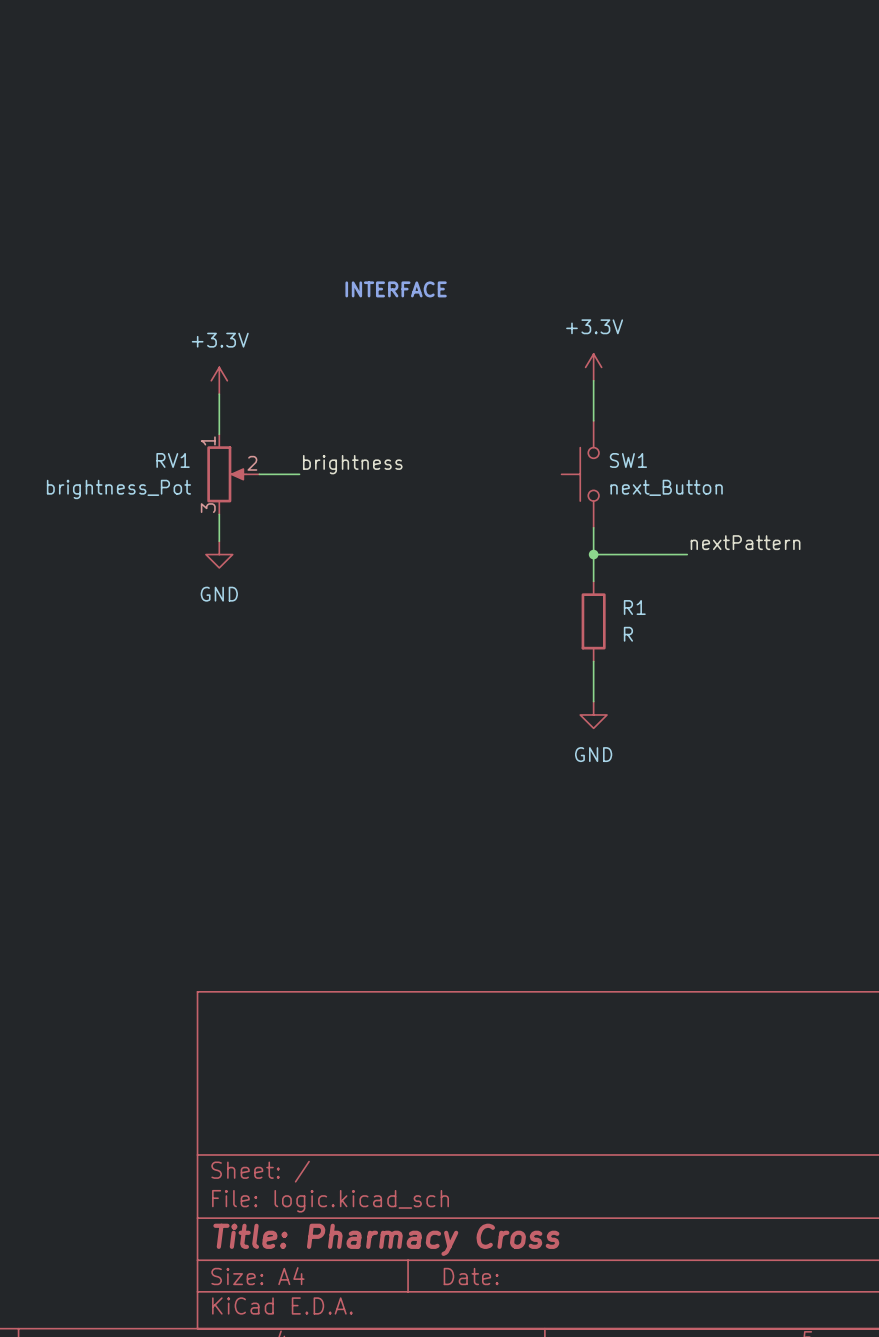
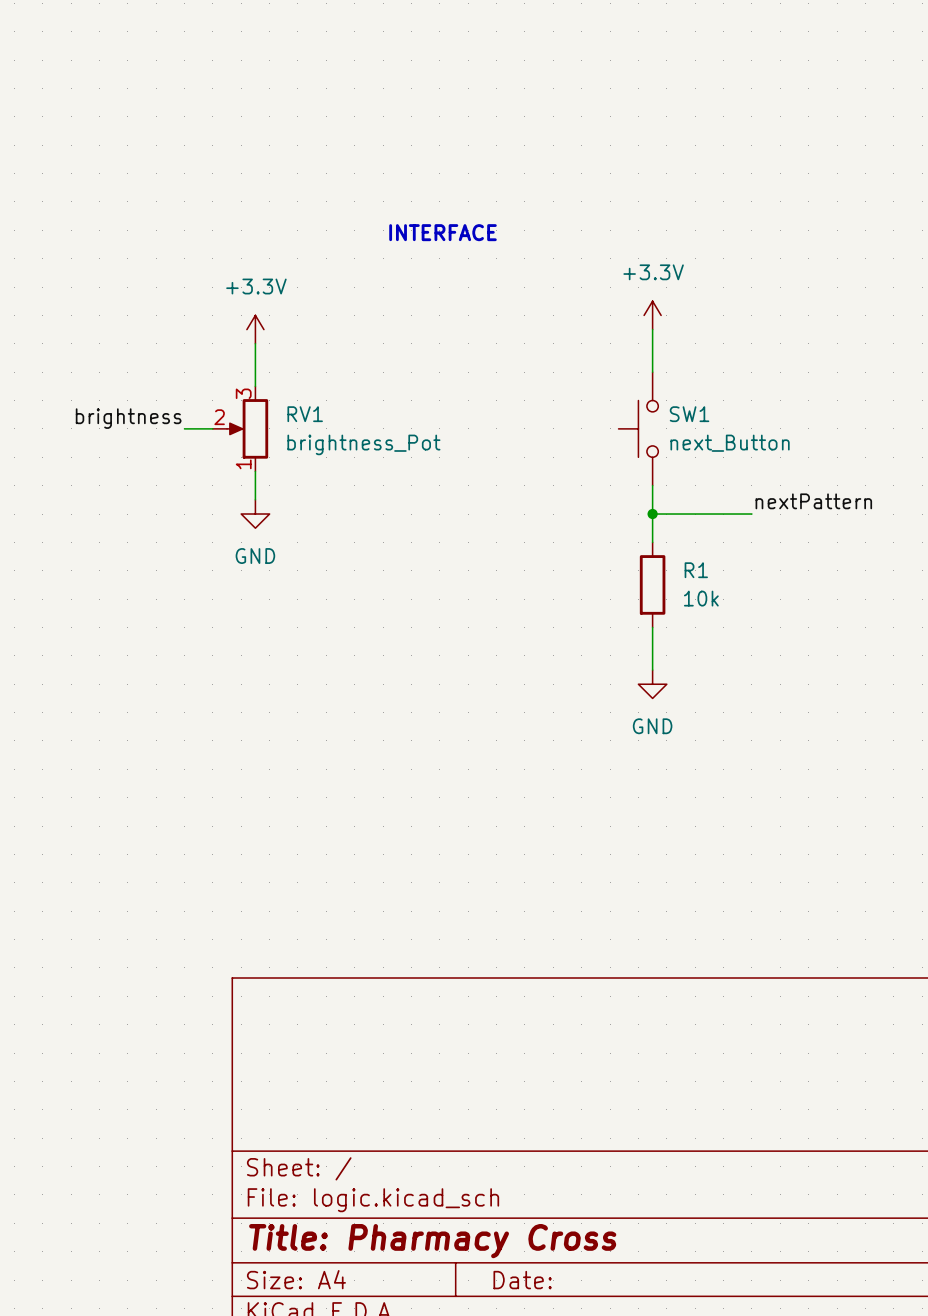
RV1 name position: RV1 (173, 460) -> RV1 (305, 414)
label position: brightness (352, 464) -> brightness (128, 418)
wire: none -> (184, 428) (212, 428)
RV1 rotation: 0° (226, 474) -> 180° (247, 428)
wire: (259, 474) (299, 474) -> none
RV1 value position: brightness_Pot (118, 489) -> brightness_Pot (363, 444)
R1 value: R (628, 634) -> 10k (701, 598)

